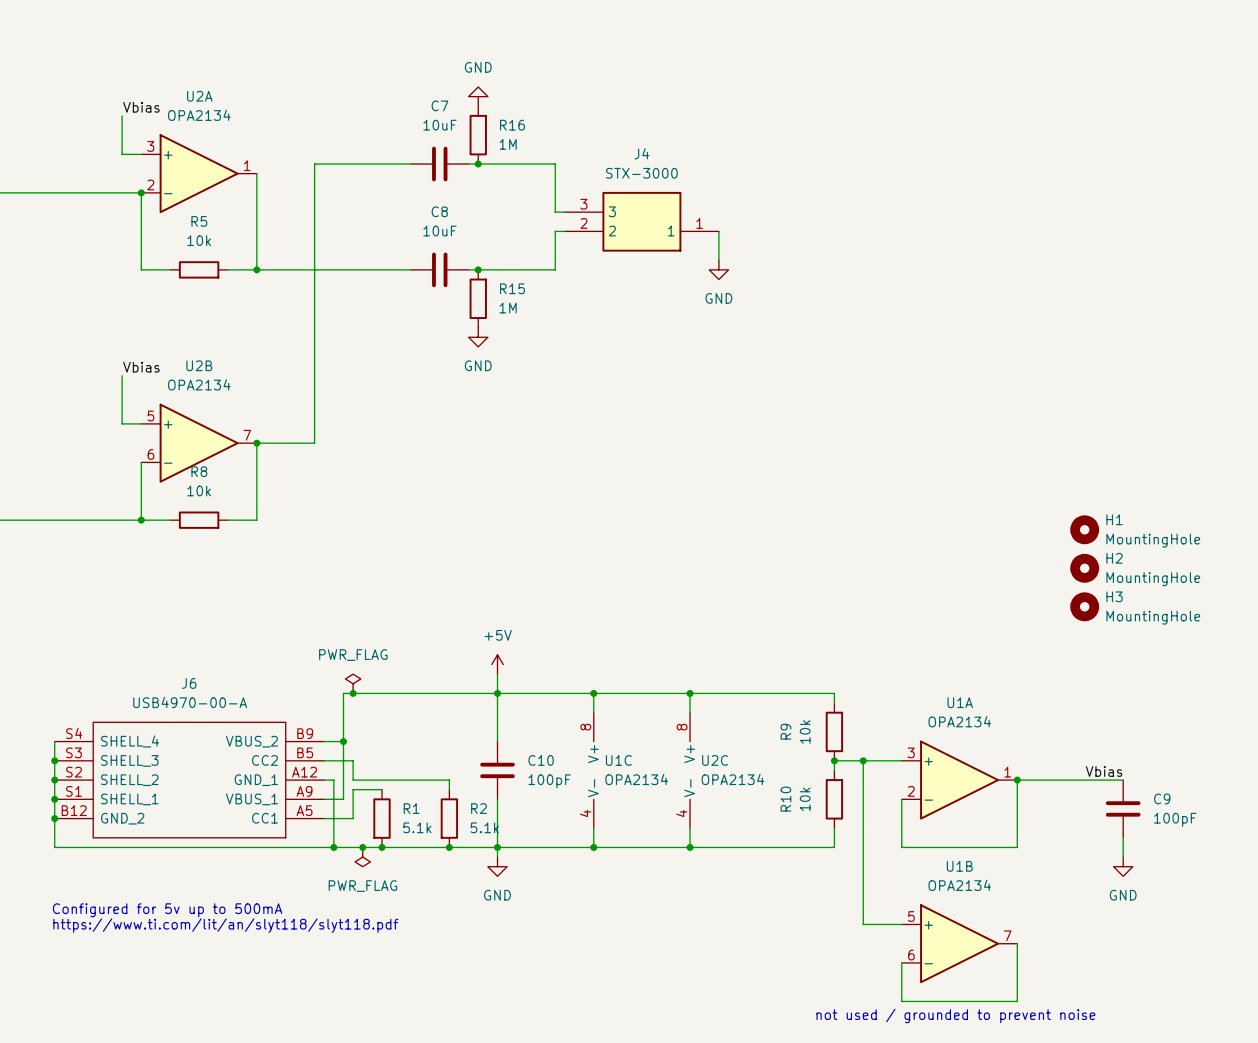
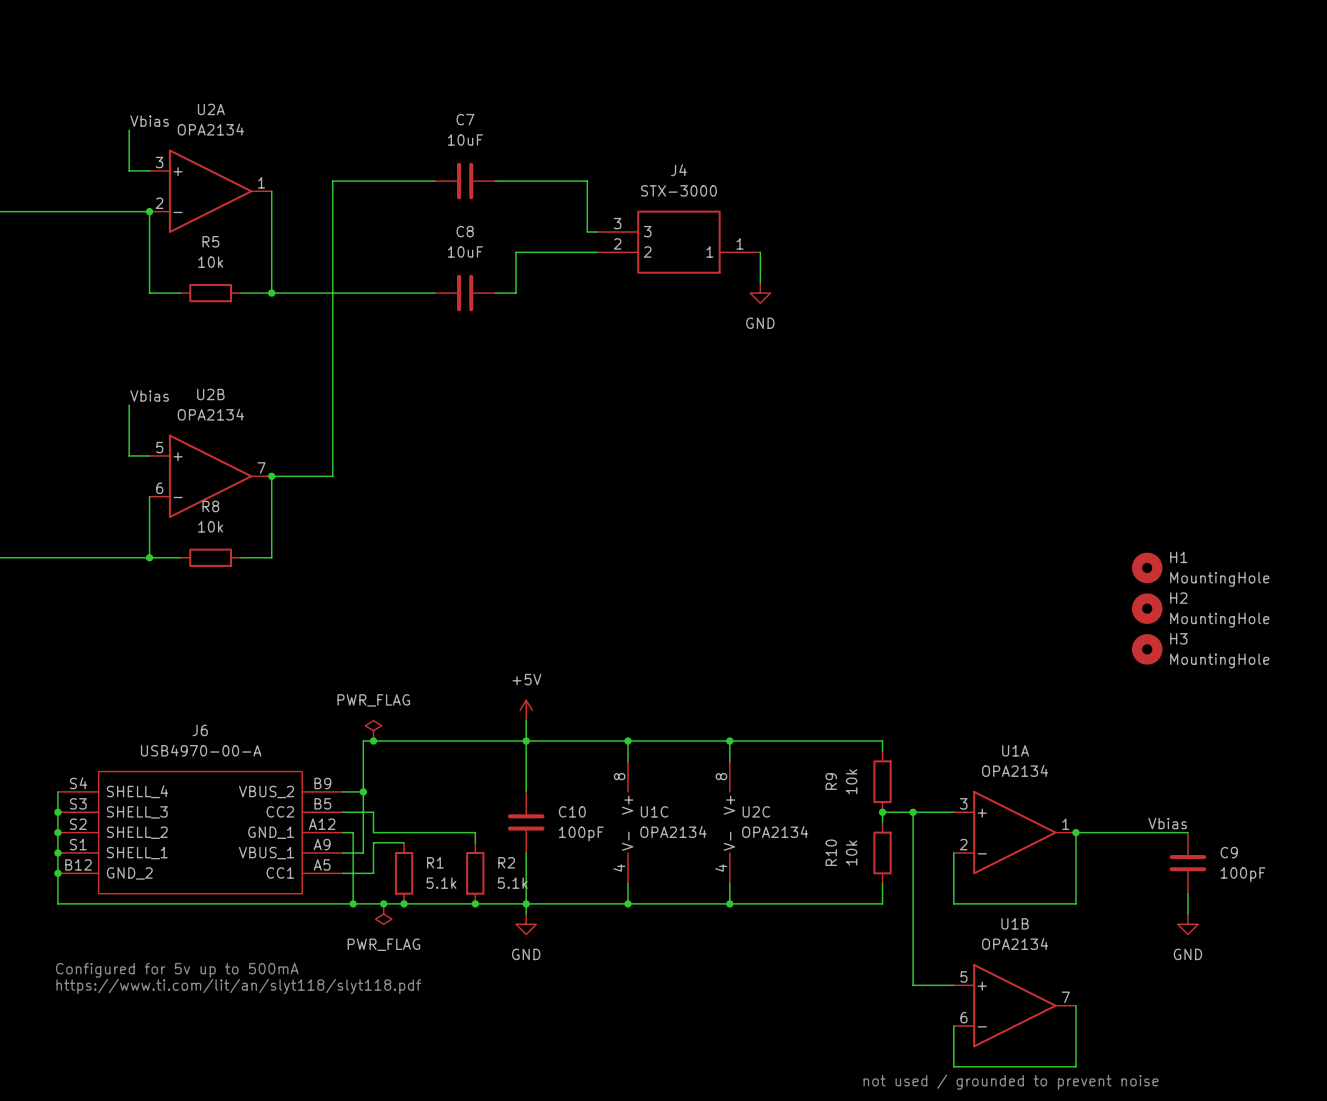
power symbol: GND (478, 96) -> none
R16: 1M (478, 135) -> none
junction: (478, 164) -> none
wire: (555, 231) (555, 269) (487, 269) -> (587, 252) (516, 252) (516, 293)
junction: (478, 269) -> none
R15: 1M (478, 298) -> none
power symbol: GND (478, 337) -> none

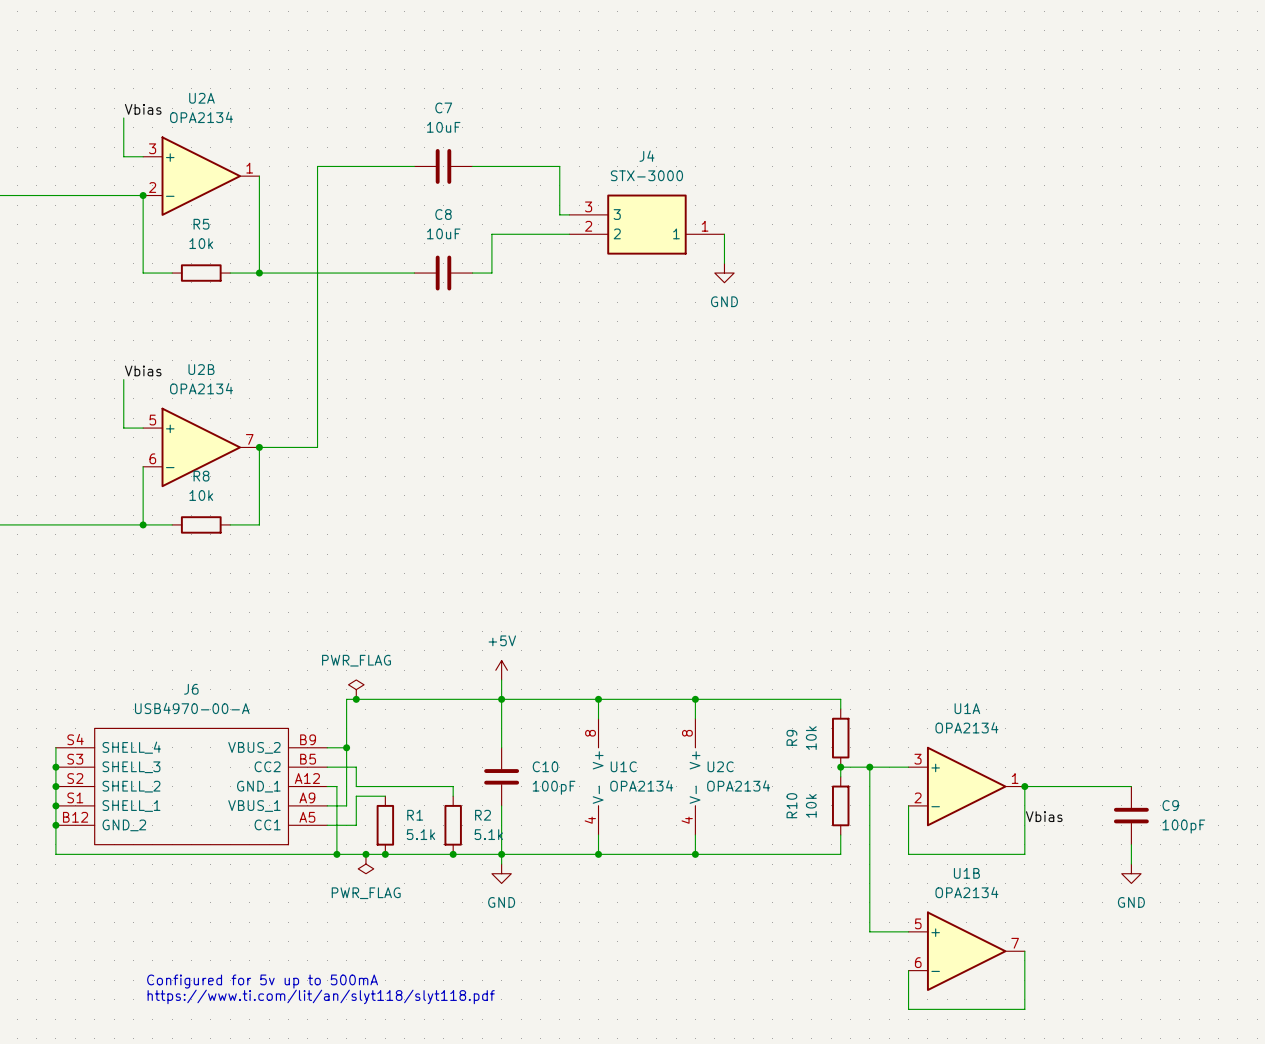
H1: MountingHole (1147, 567) -> none
H2: MountingHole (1147, 608) -> none
H3: MountingHole (1147, 649) -> none
label position: Vbias (1167, 823) -> Vbias (1044, 816)
text position: Configured for 5v up to 500mA (177, 970) -> Configured for 5v up to 500mA (262, 981)
text position: https://www.ti.com/lit/an/slyt118/slyt118.pdf (238, 986) -> https://www.ti.com/lit/an/slyt118/slyt118.pdf (321, 996)
text: not used / grounded to prevent noise (1011, 1082) -> none

